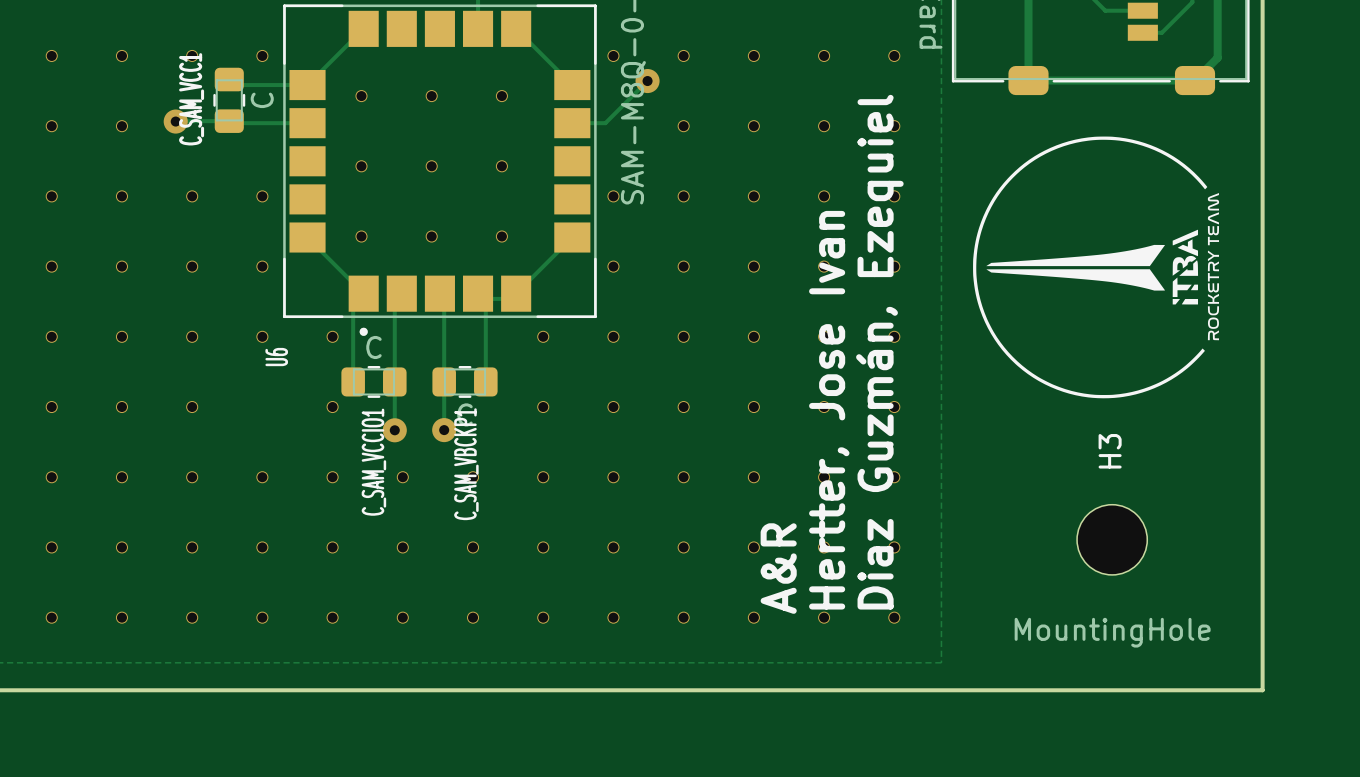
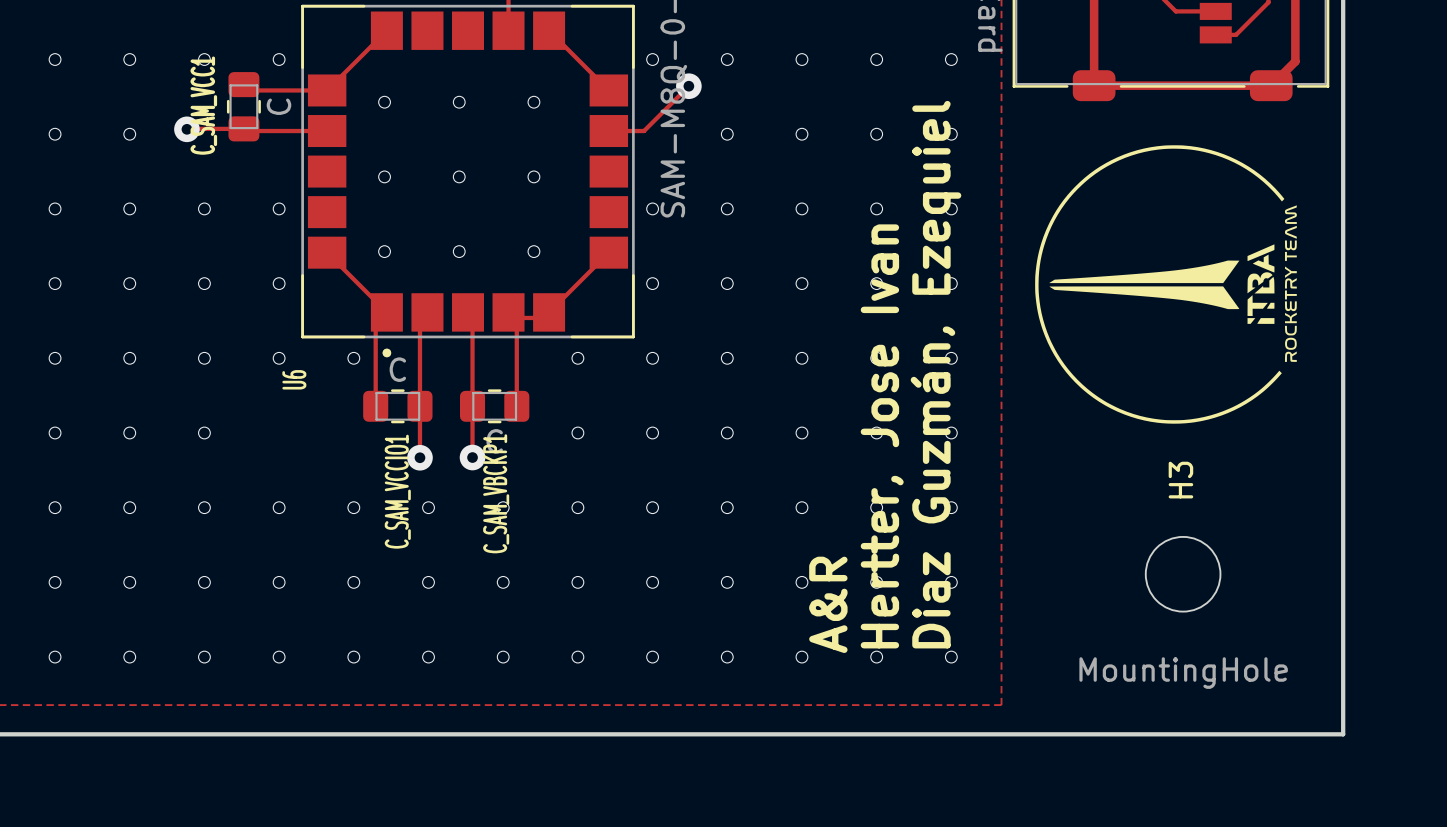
via: (332, 407) -> none

